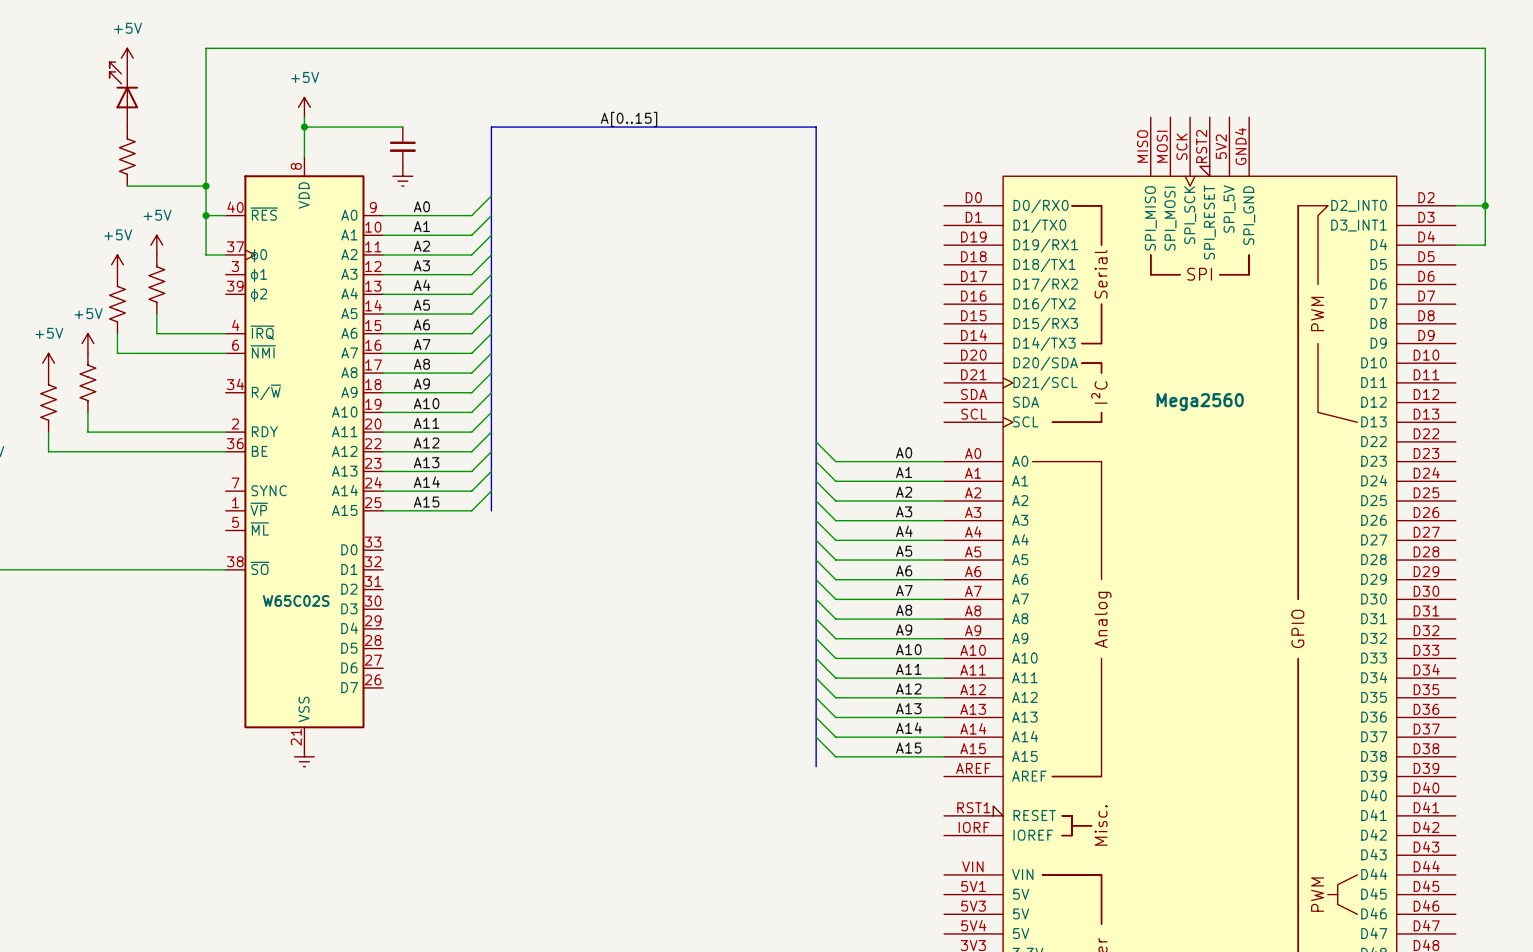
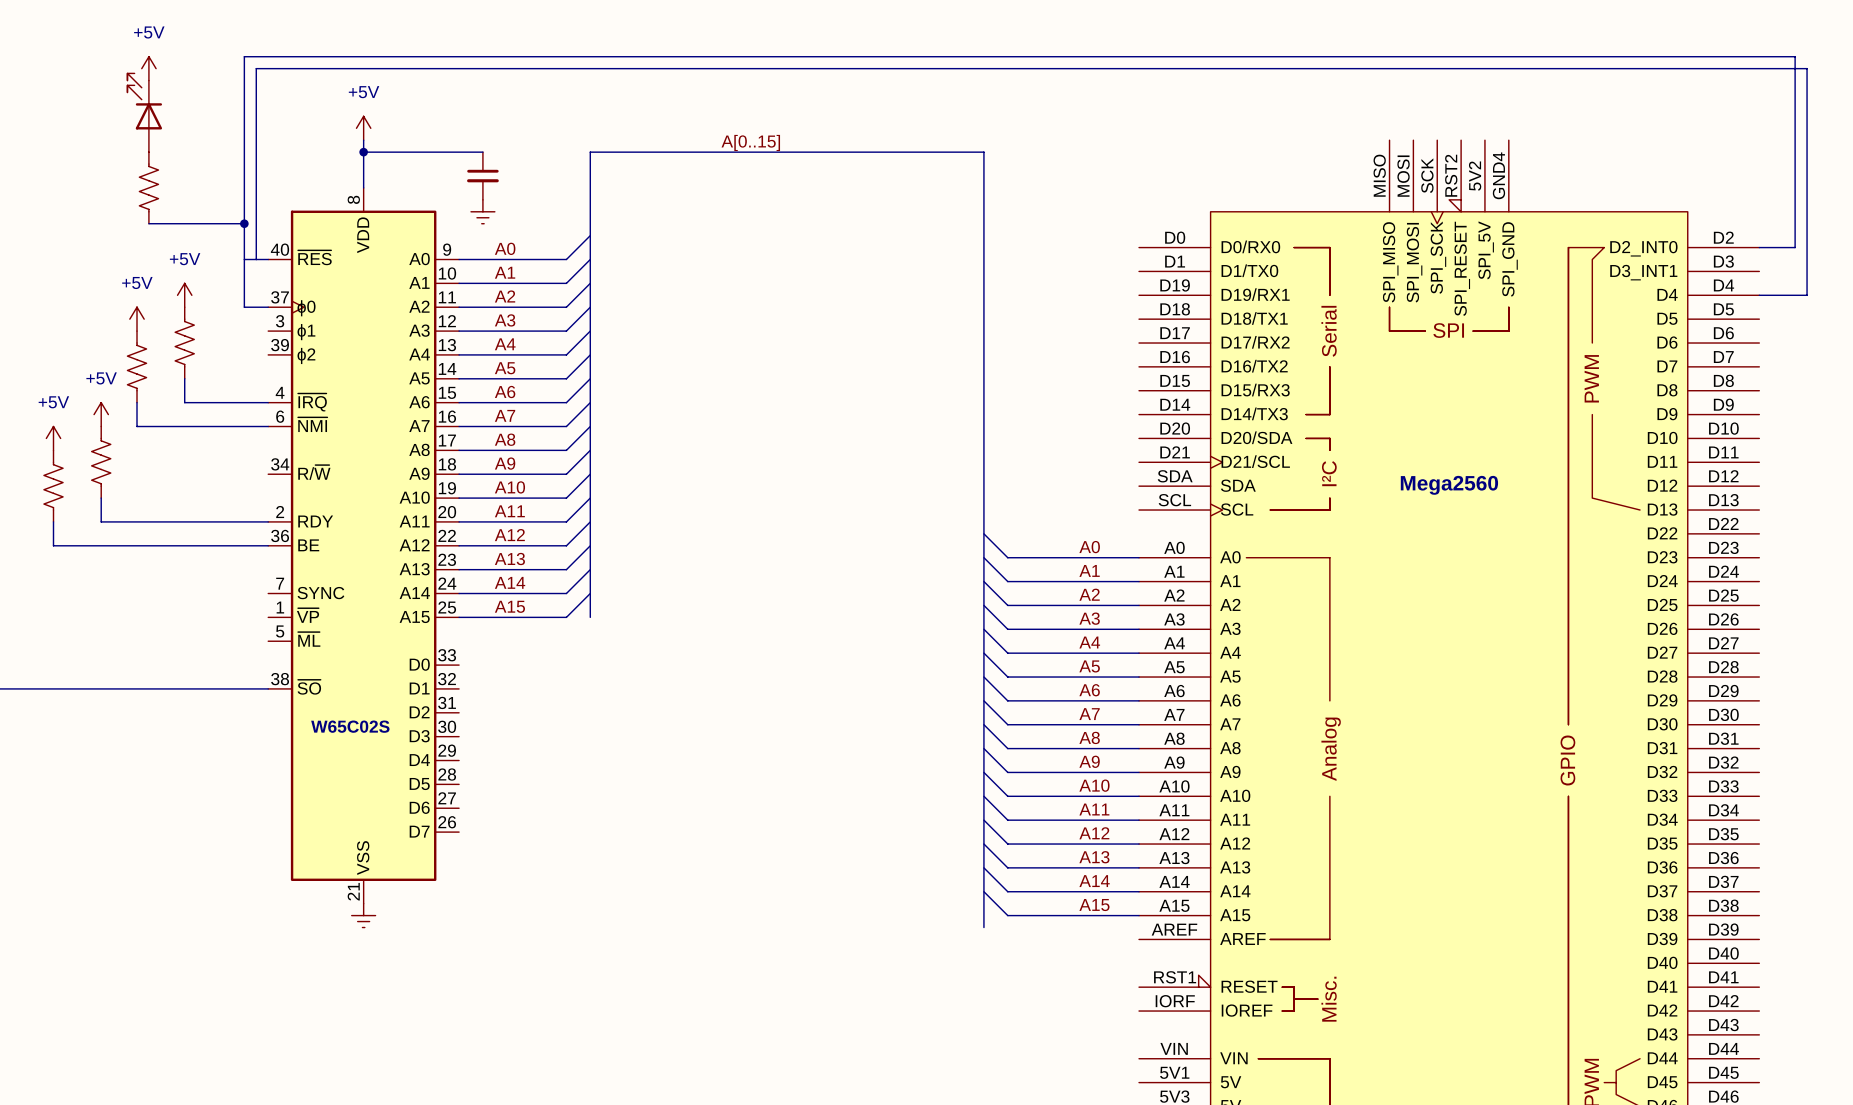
wire: (1485, 205) (1485, 245) -> (256, 259) (256, 68) (1807, 68) (1807, 295) (1795, 295)
junction: (1485, 205) -> none
junction: (206, 215) -> none

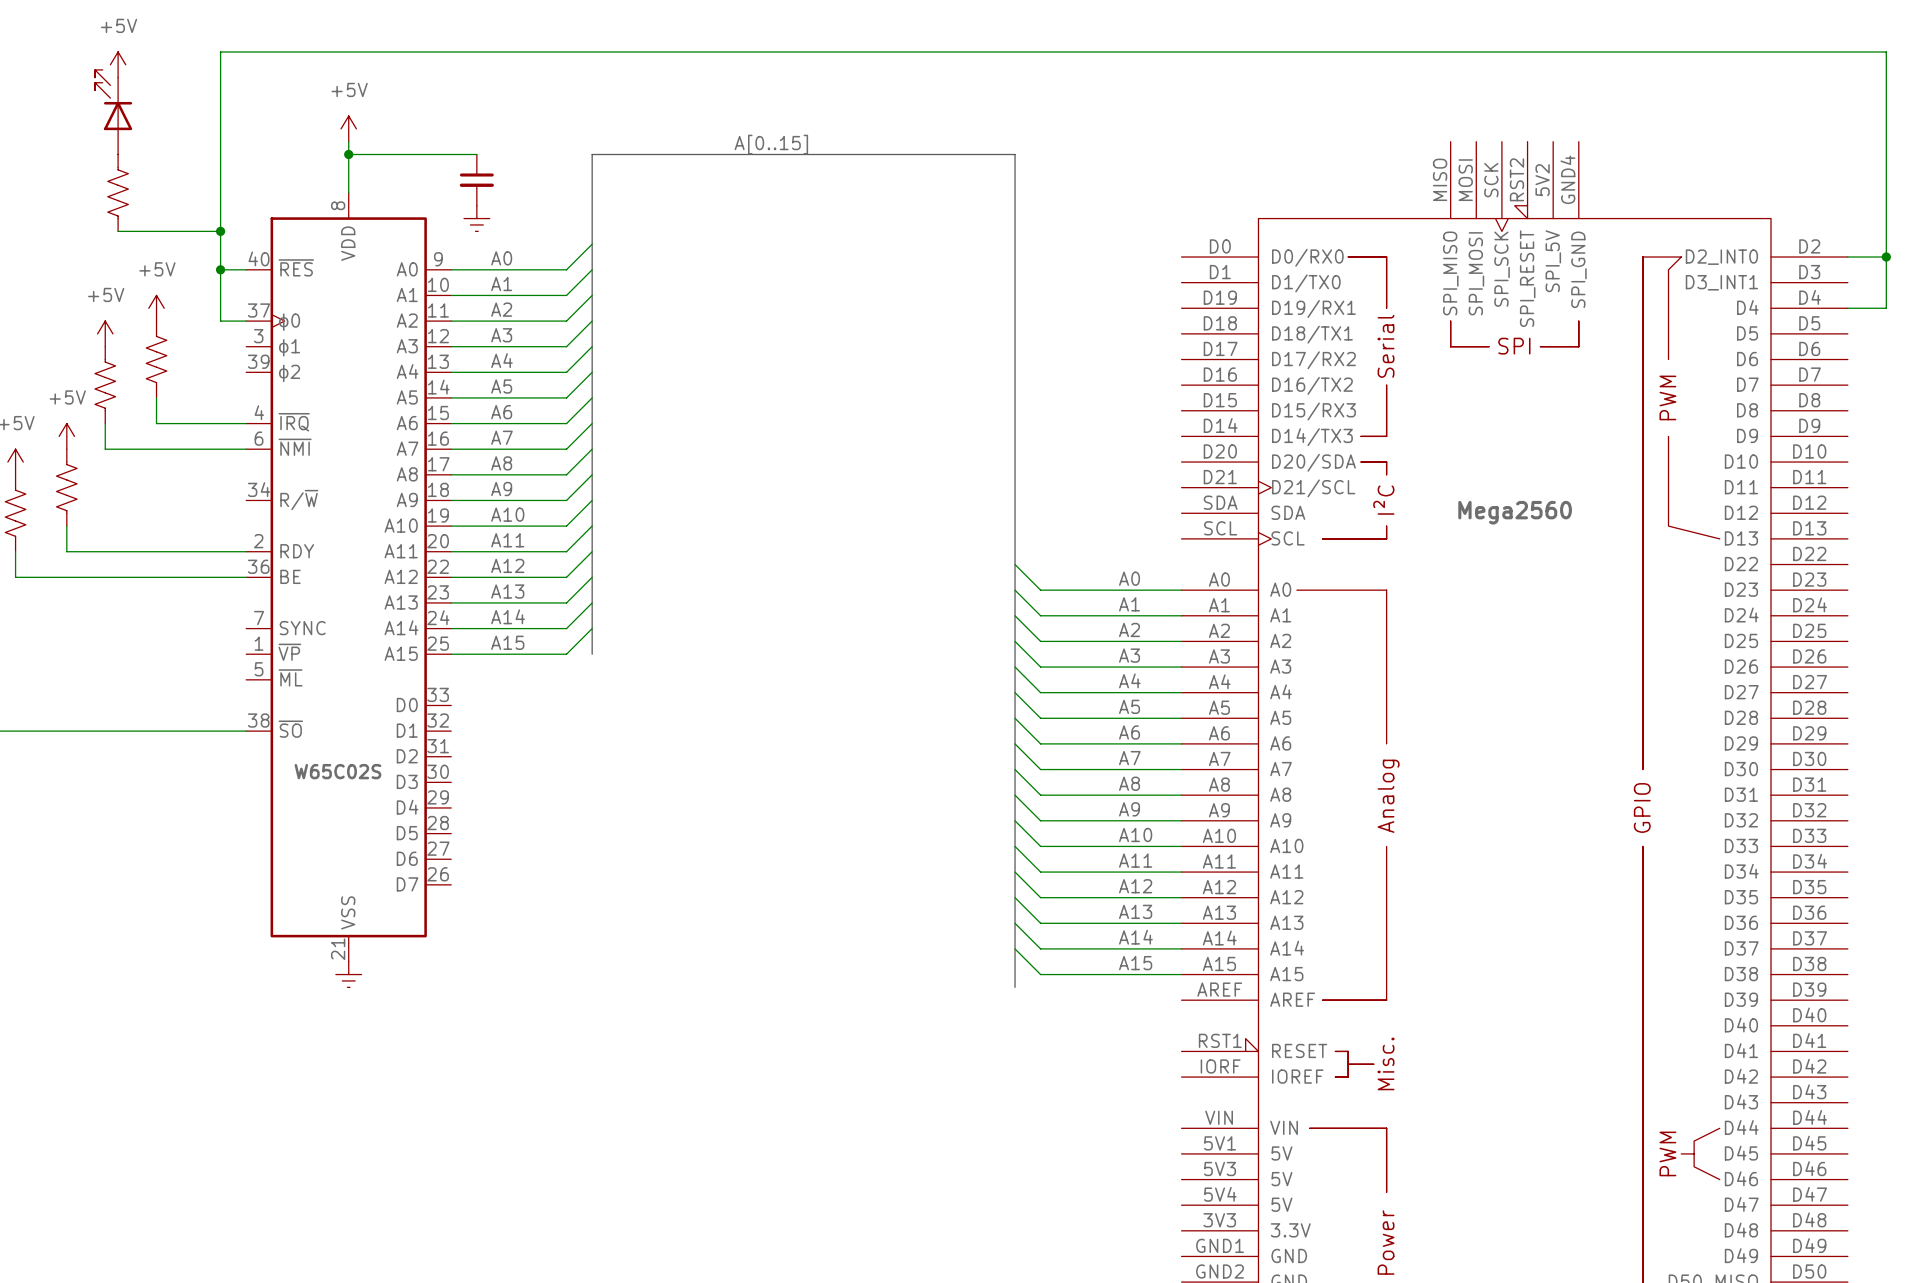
junction: none -> (1886, 257)
junction: none -> (220, 269)
wire: (256, 259) (256, 68) (1807, 68) (1807, 295) (1795, 295) -> (1886, 257) (1886, 308)

